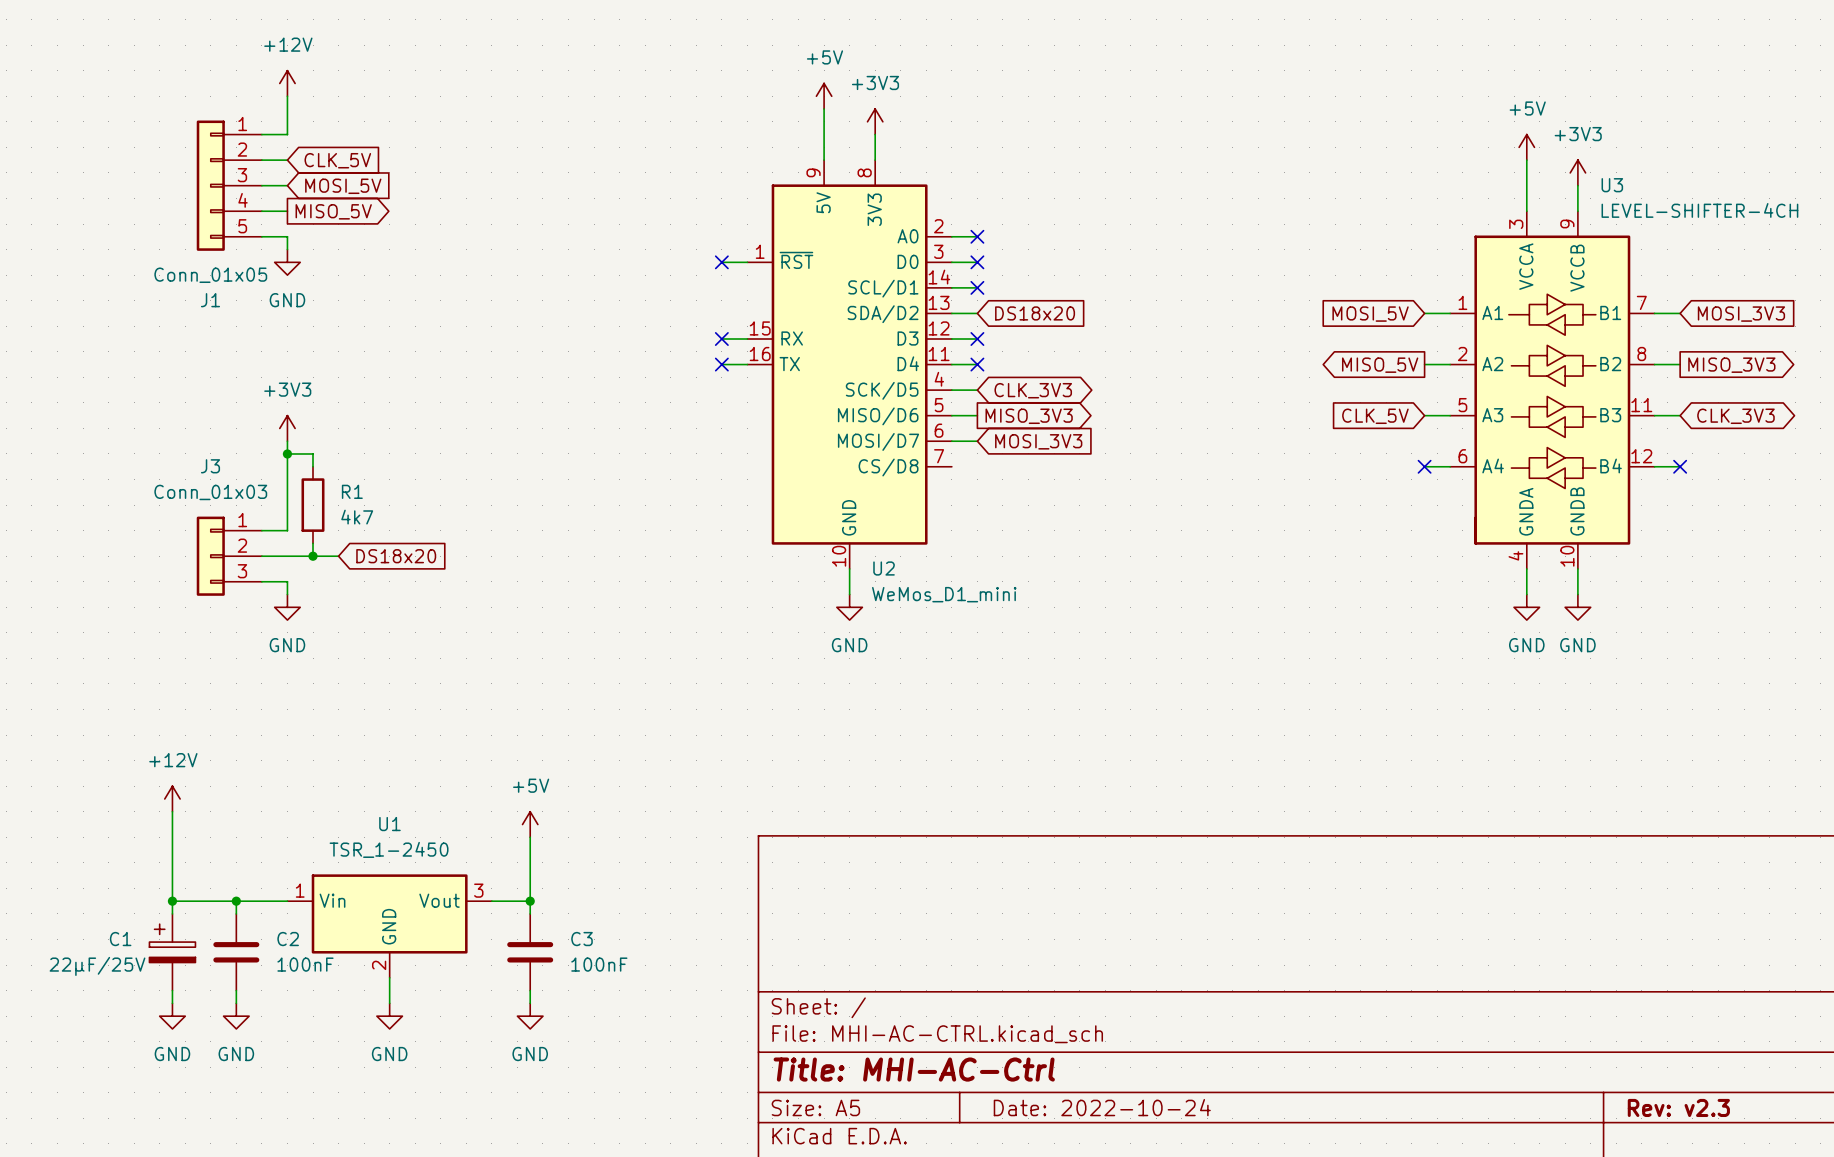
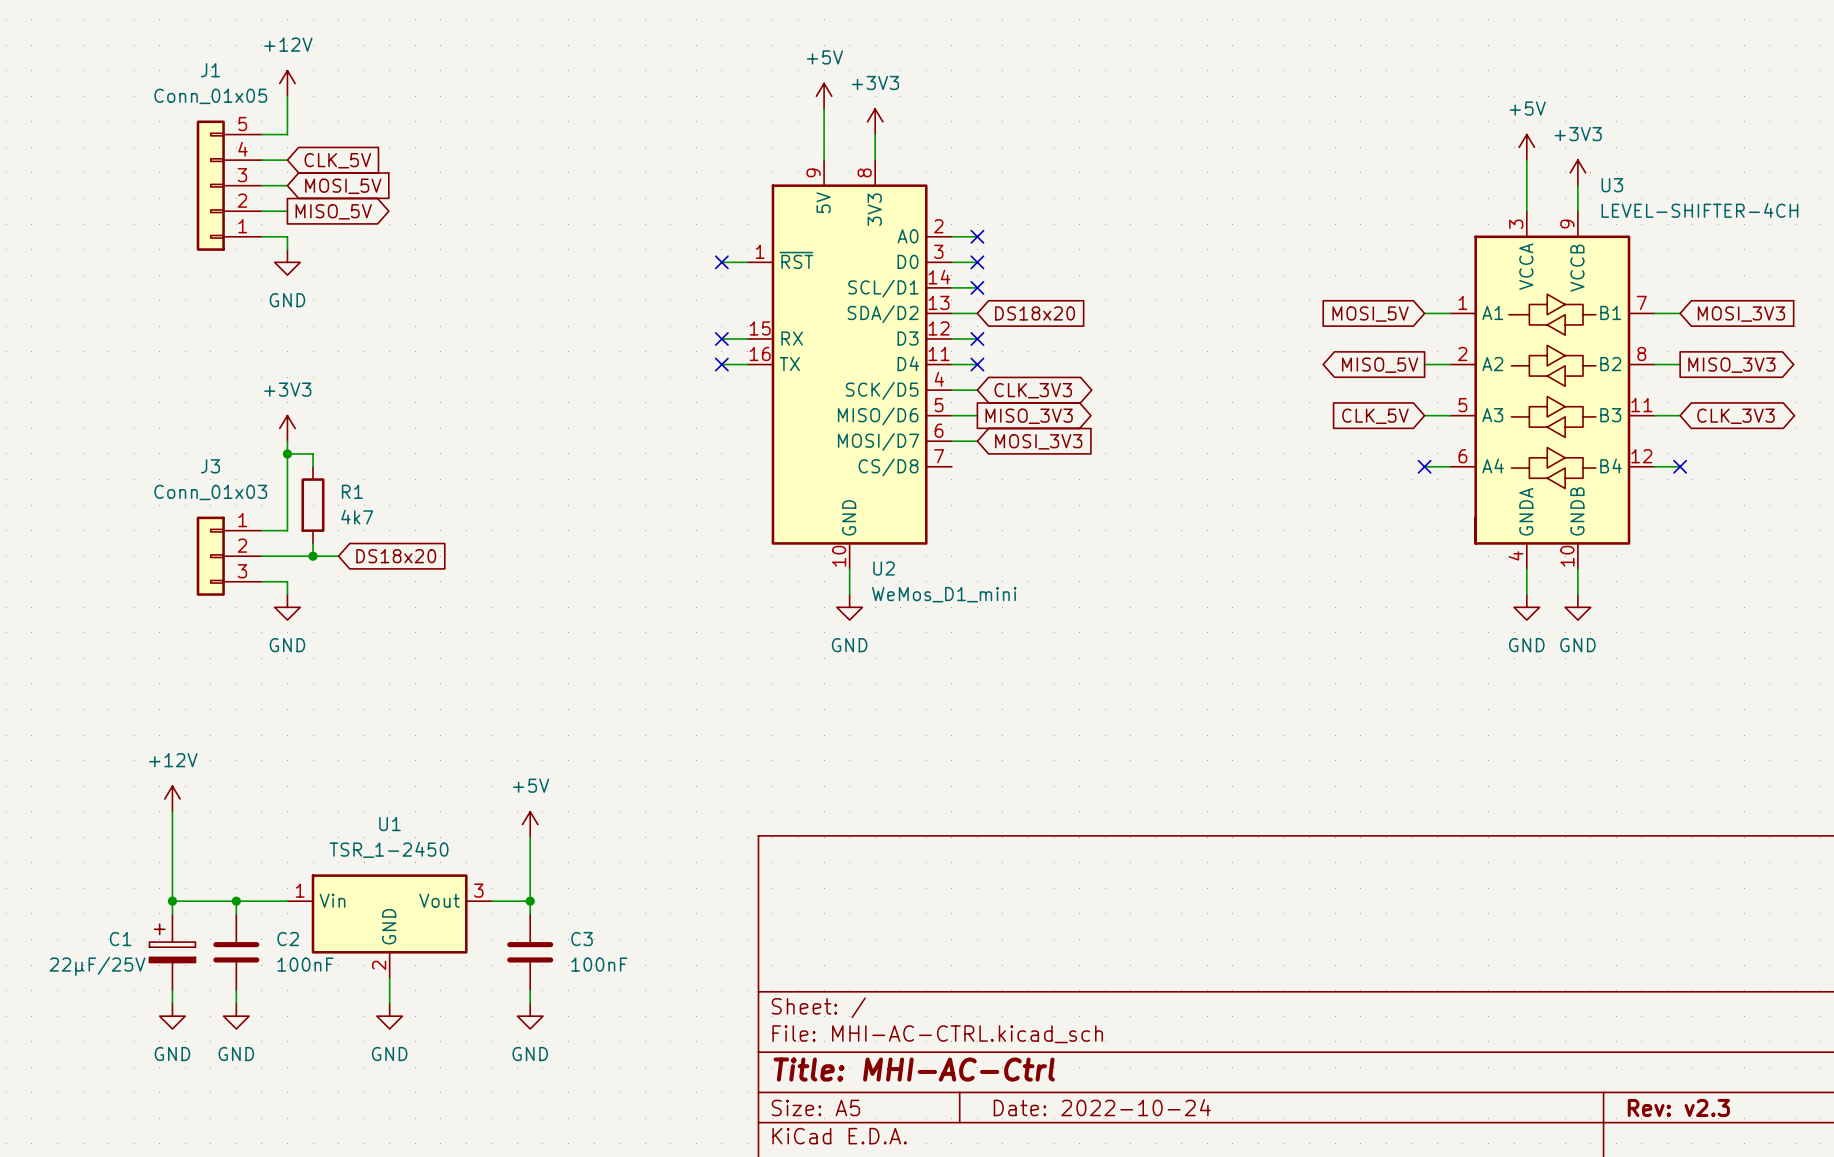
J1 flip: as is (210, 185) -> up-down (210, 185)

